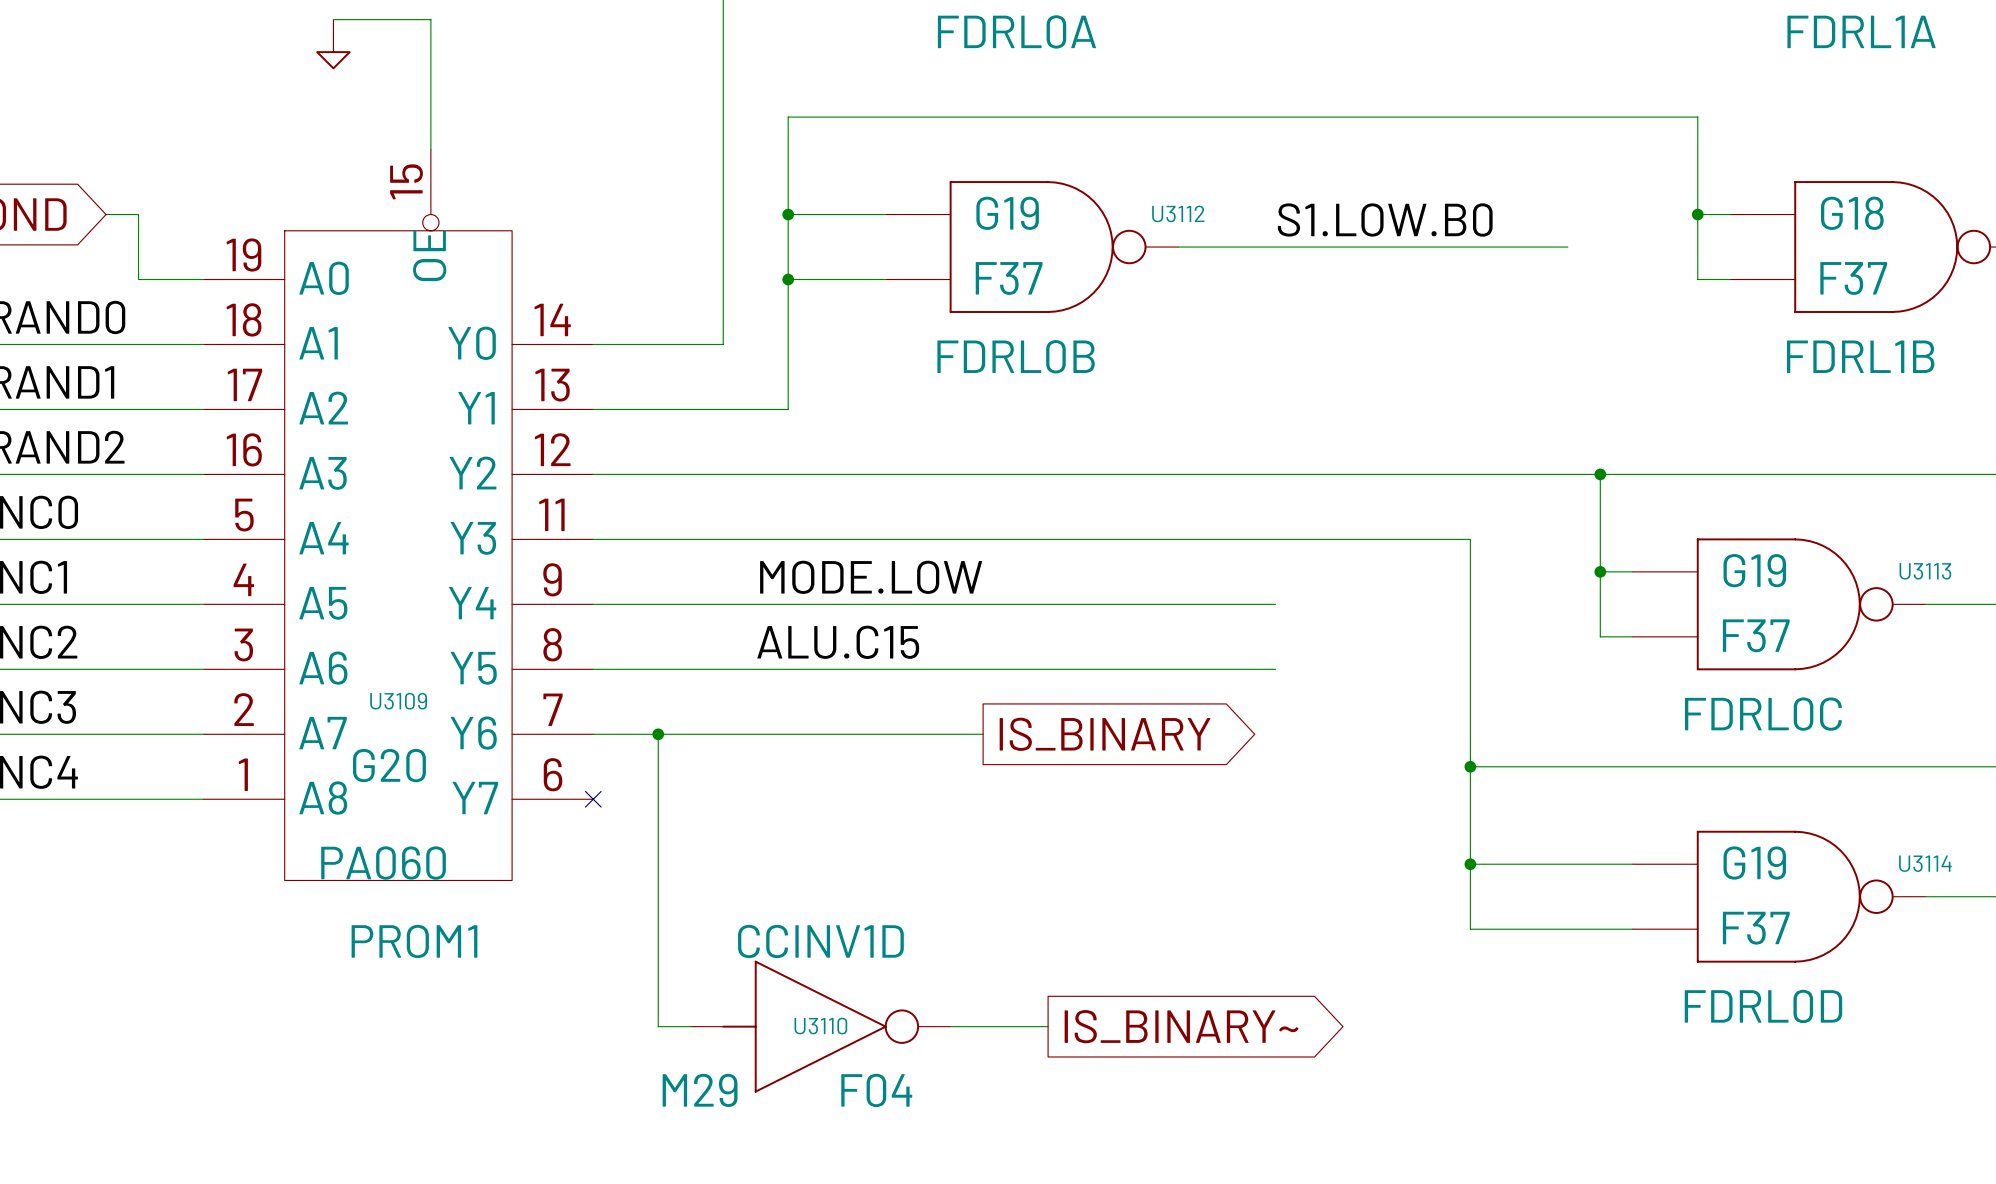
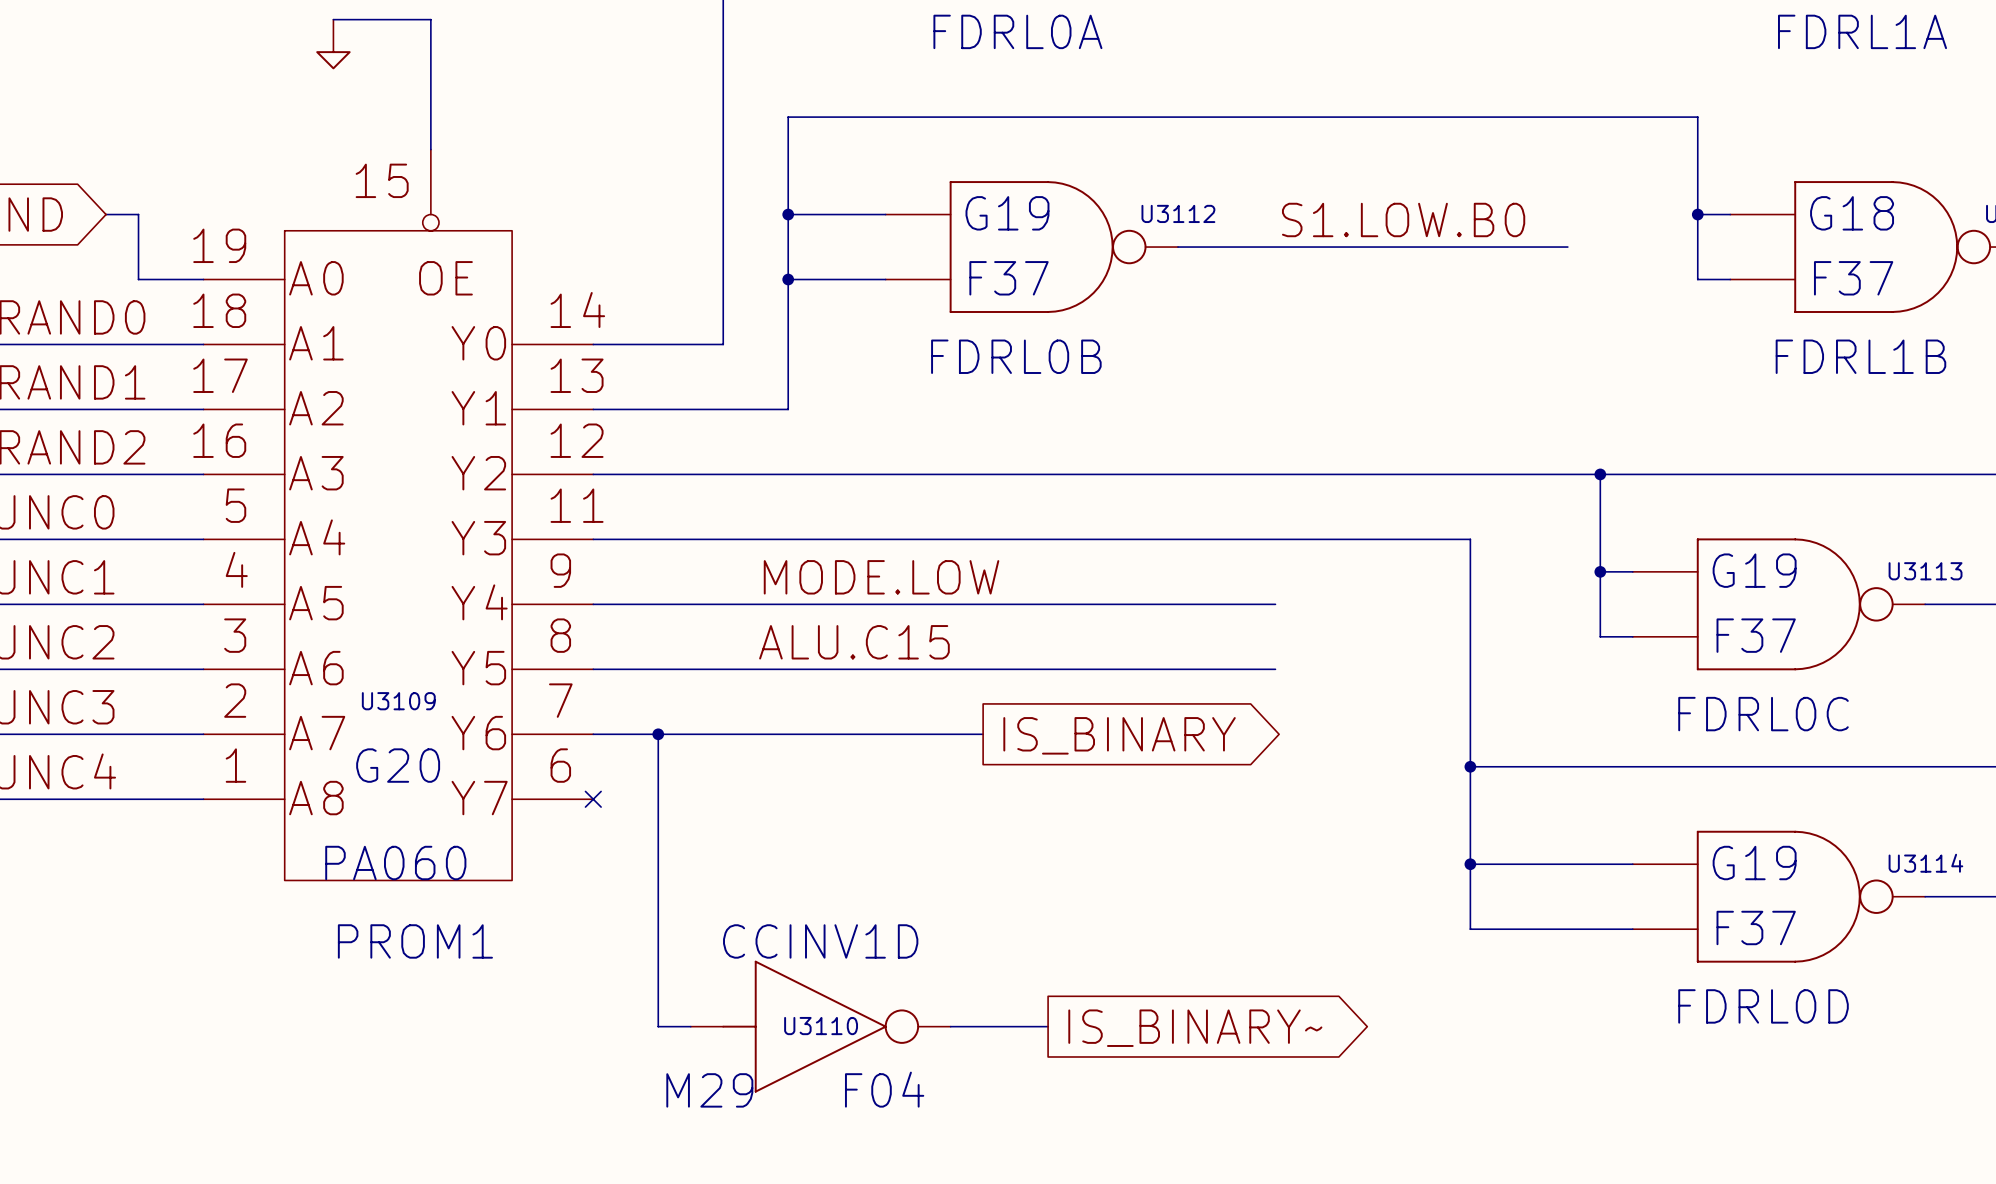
U3109 symbol: [203, 149, 594, 881] -> [203, 149, 594, 881]

